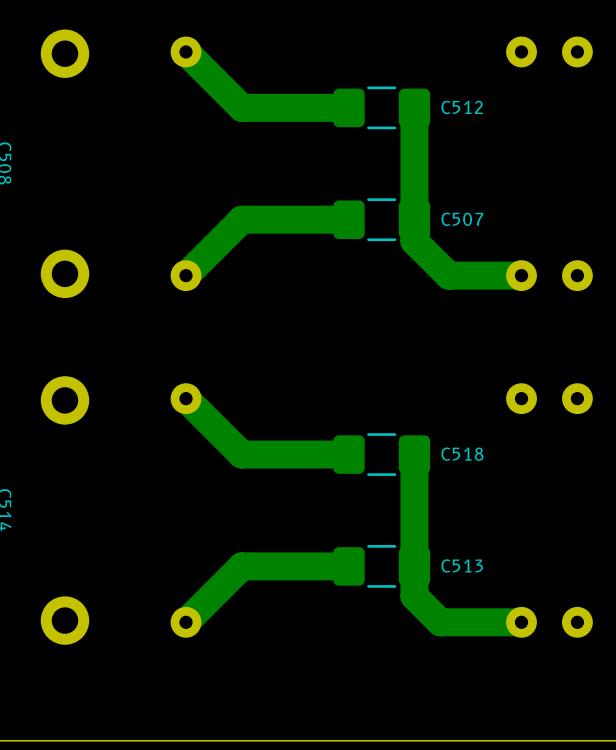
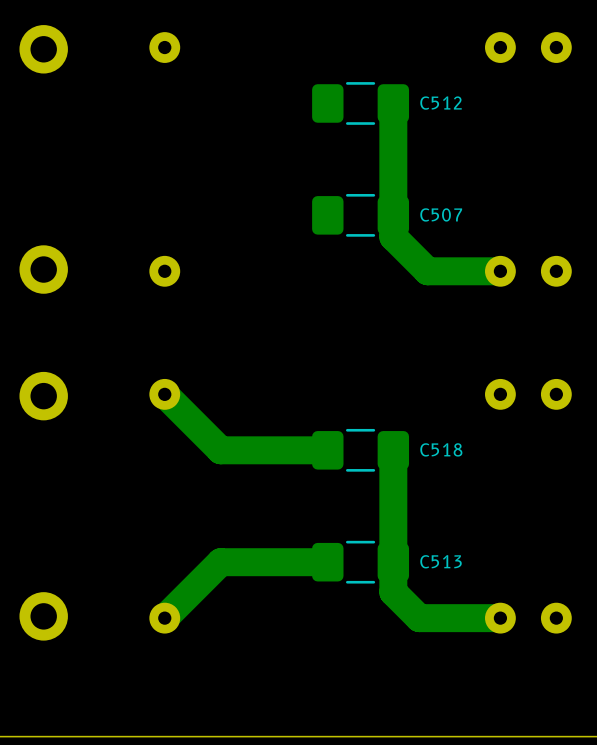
bottom track: (186, 51) (241, 107) (348, 107) -> none
bottom track: (348, 219) (241, 219) (186, 275) -> none

